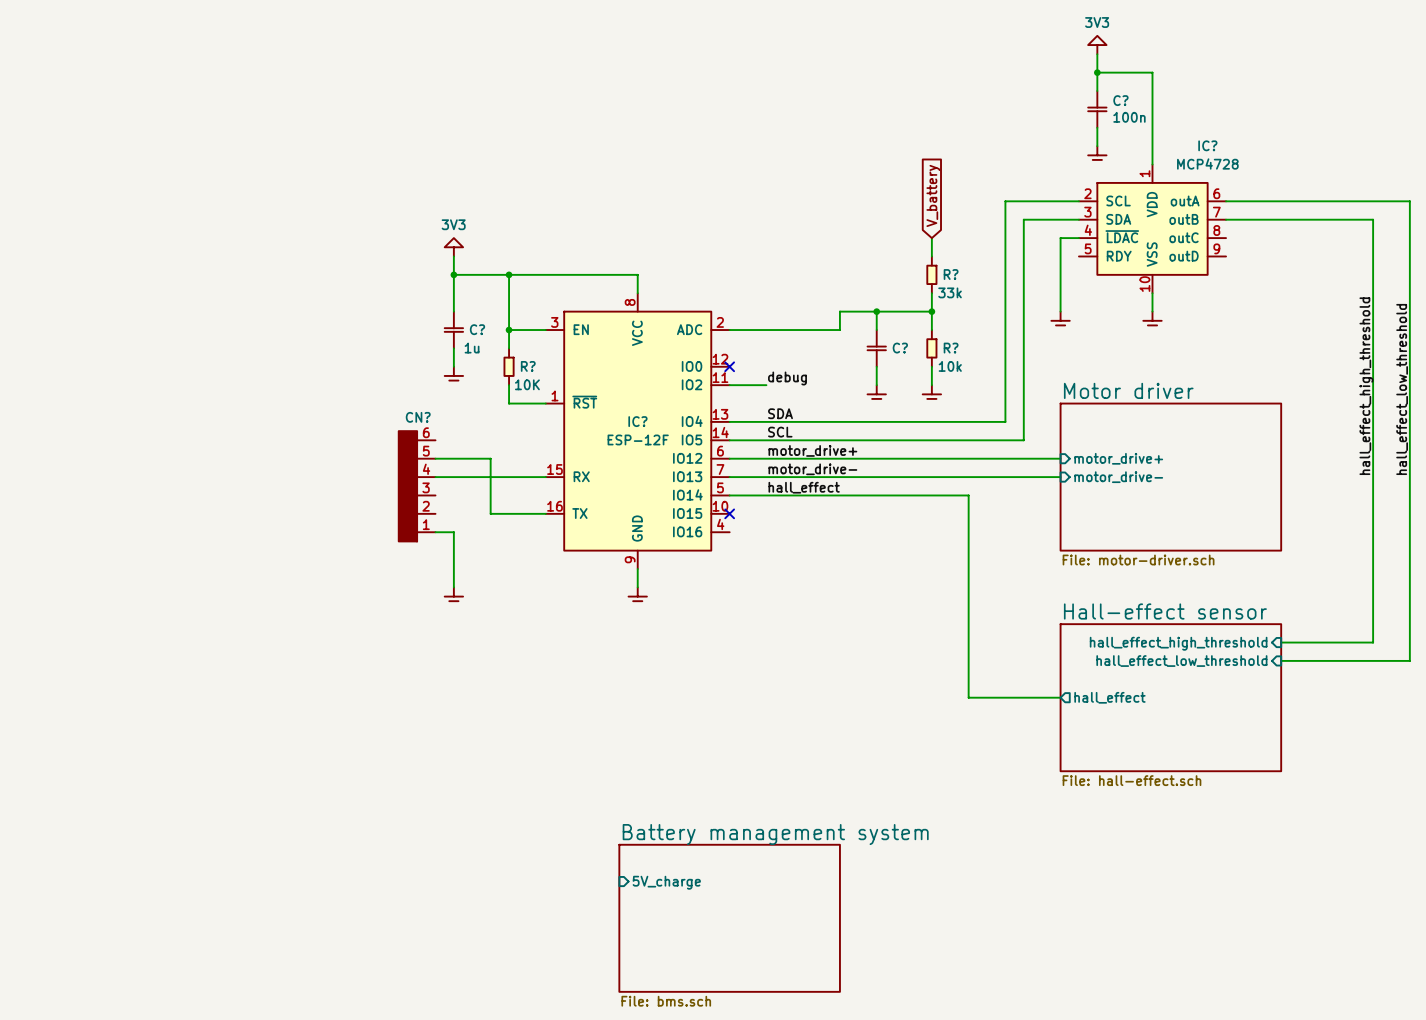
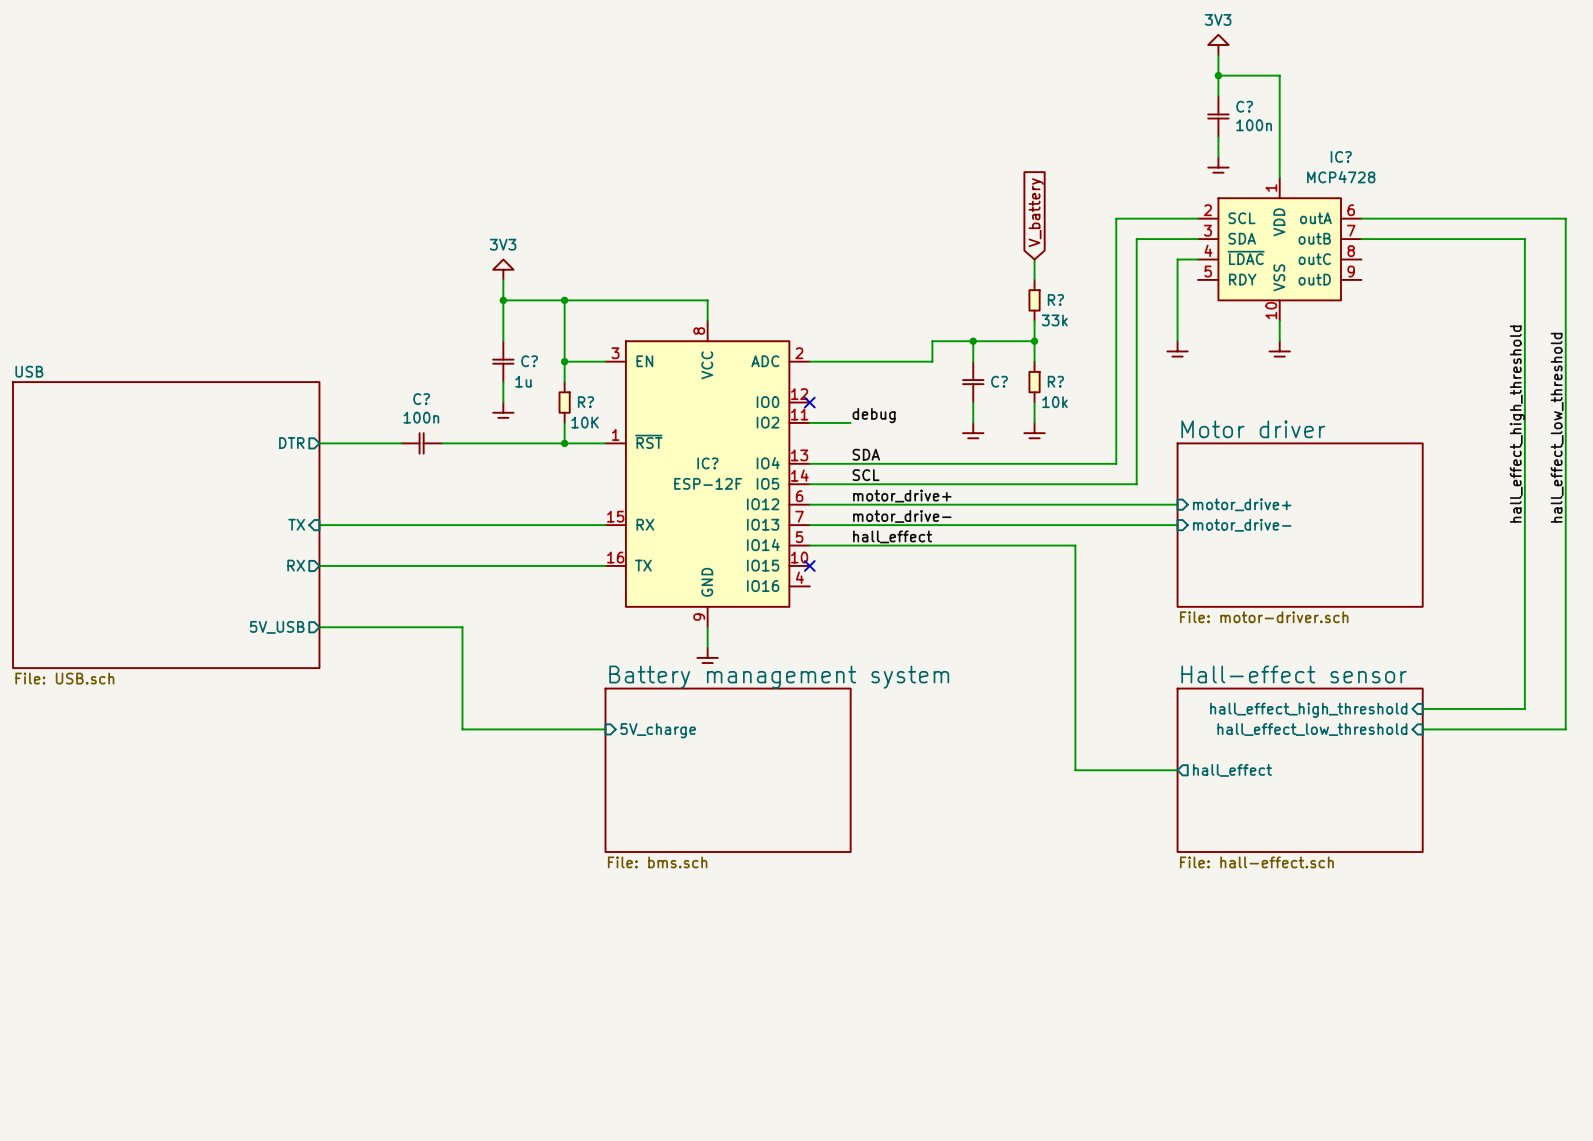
sheet pin: none -> DTR (291, 443)
wire: none -> (319, 443) (401, 443)
C?: none -> 100n (421, 443)
wire: none -> (442, 443) (564, 443)
junction: none -> (564, 443)
wire: (435, 458) (490, 458) (490, 513) -> (319, 565) (544, 565)
sheet pin: none -> TX (296, 524)
sheet USB: none -> File: USB.sch (166, 525)
wire: none -> (319, 525) (482, 525)
CN?: (417, 486) -> none
sheet pin: none -> RX (296, 565)
wire: (435, 532) (453, 532) (453, 587) -> none
sheet pin: none -> 5V_USB (277, 627)
wire: none -> (319, 627) (462, 627) (462, 729) (605, 729)
power symbol: (453, 596) -> none
sheet pin: none -> 5V_charge (658, 730)
sheet Battery management system: none -> File: bms.sch (728, 770)
sheet pin: 5V_charge (666, 882) -> none
sheet Battery management system: File: bms.sch (729, 918) -> none

